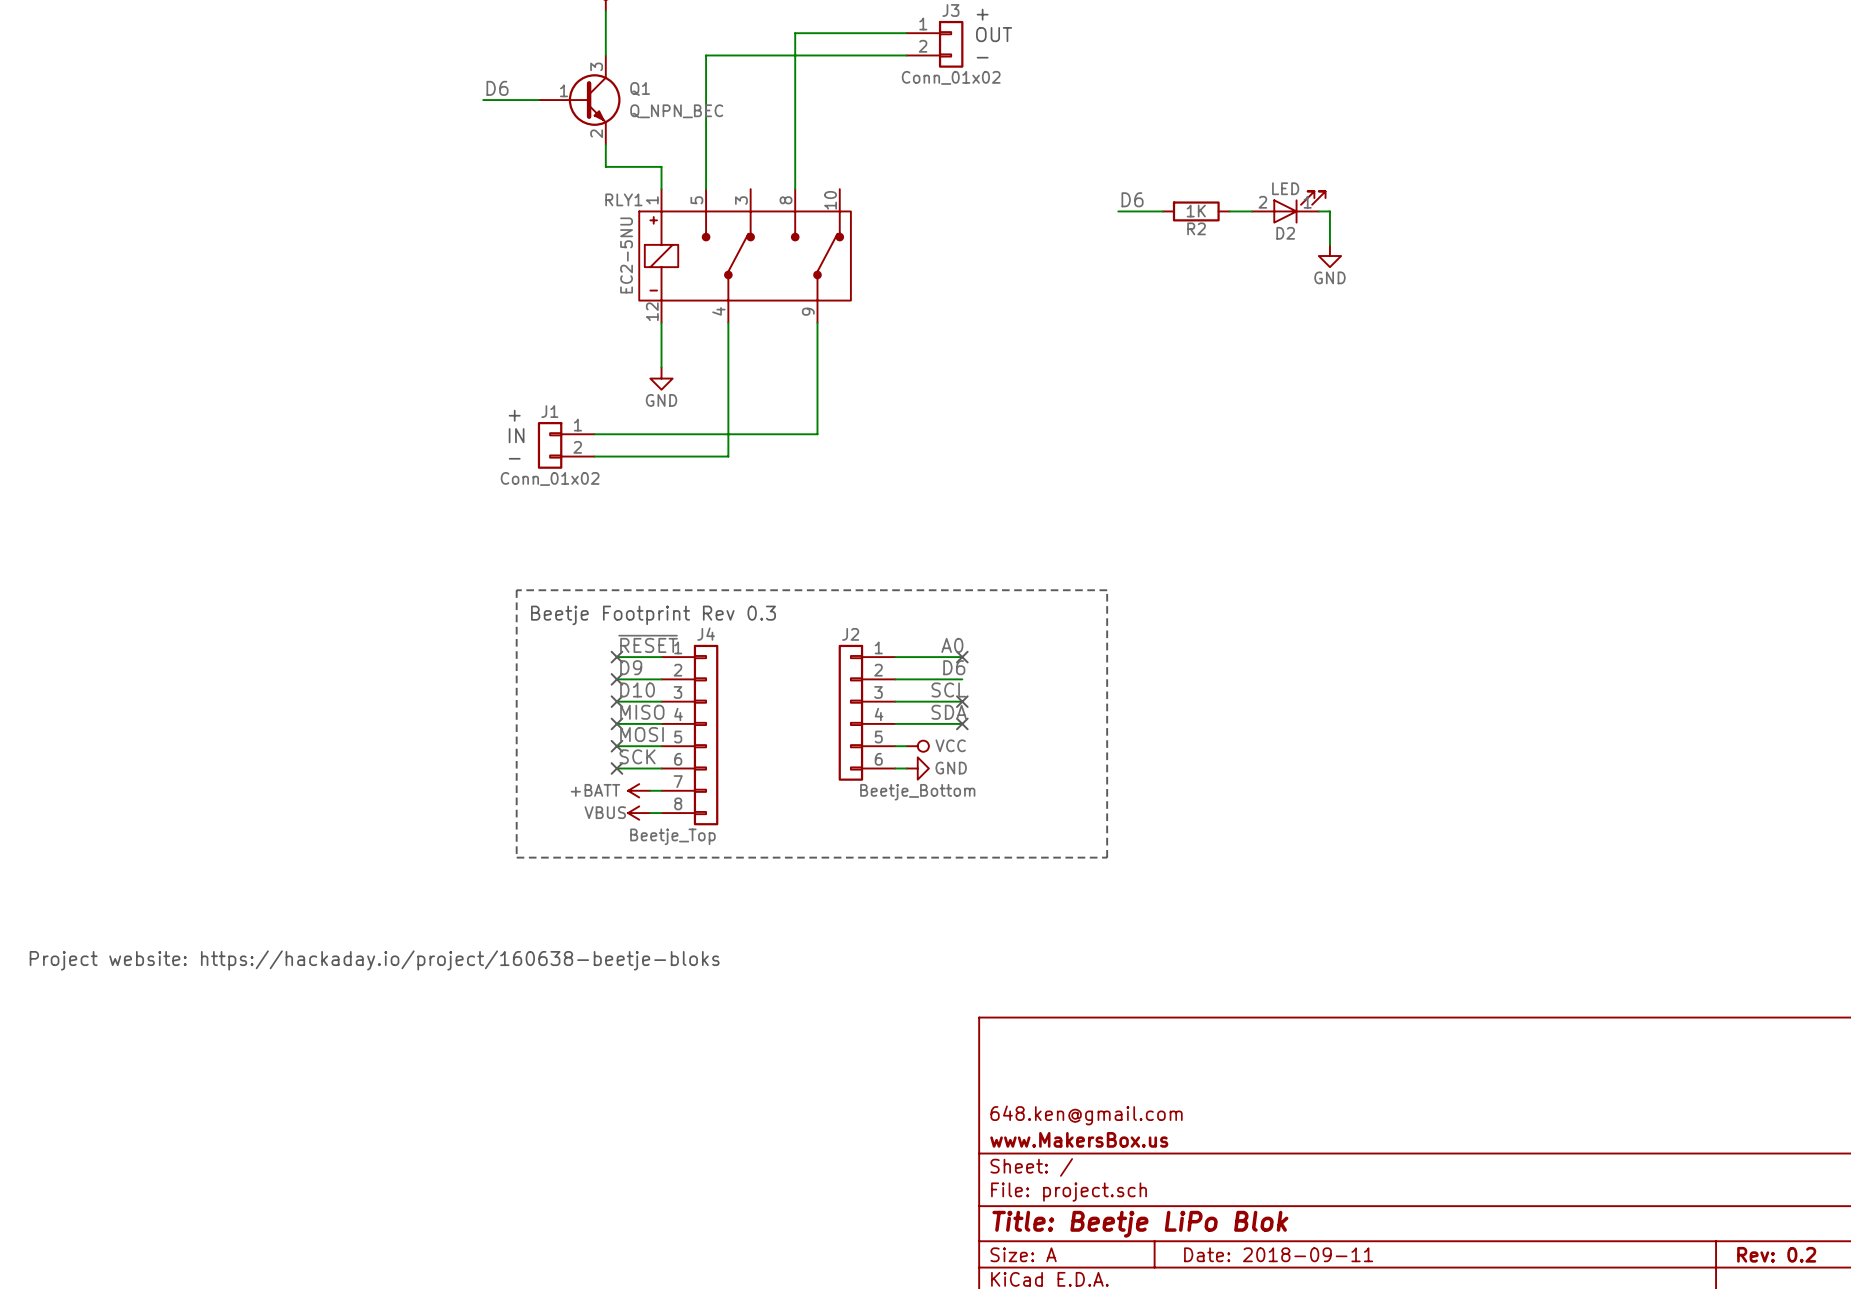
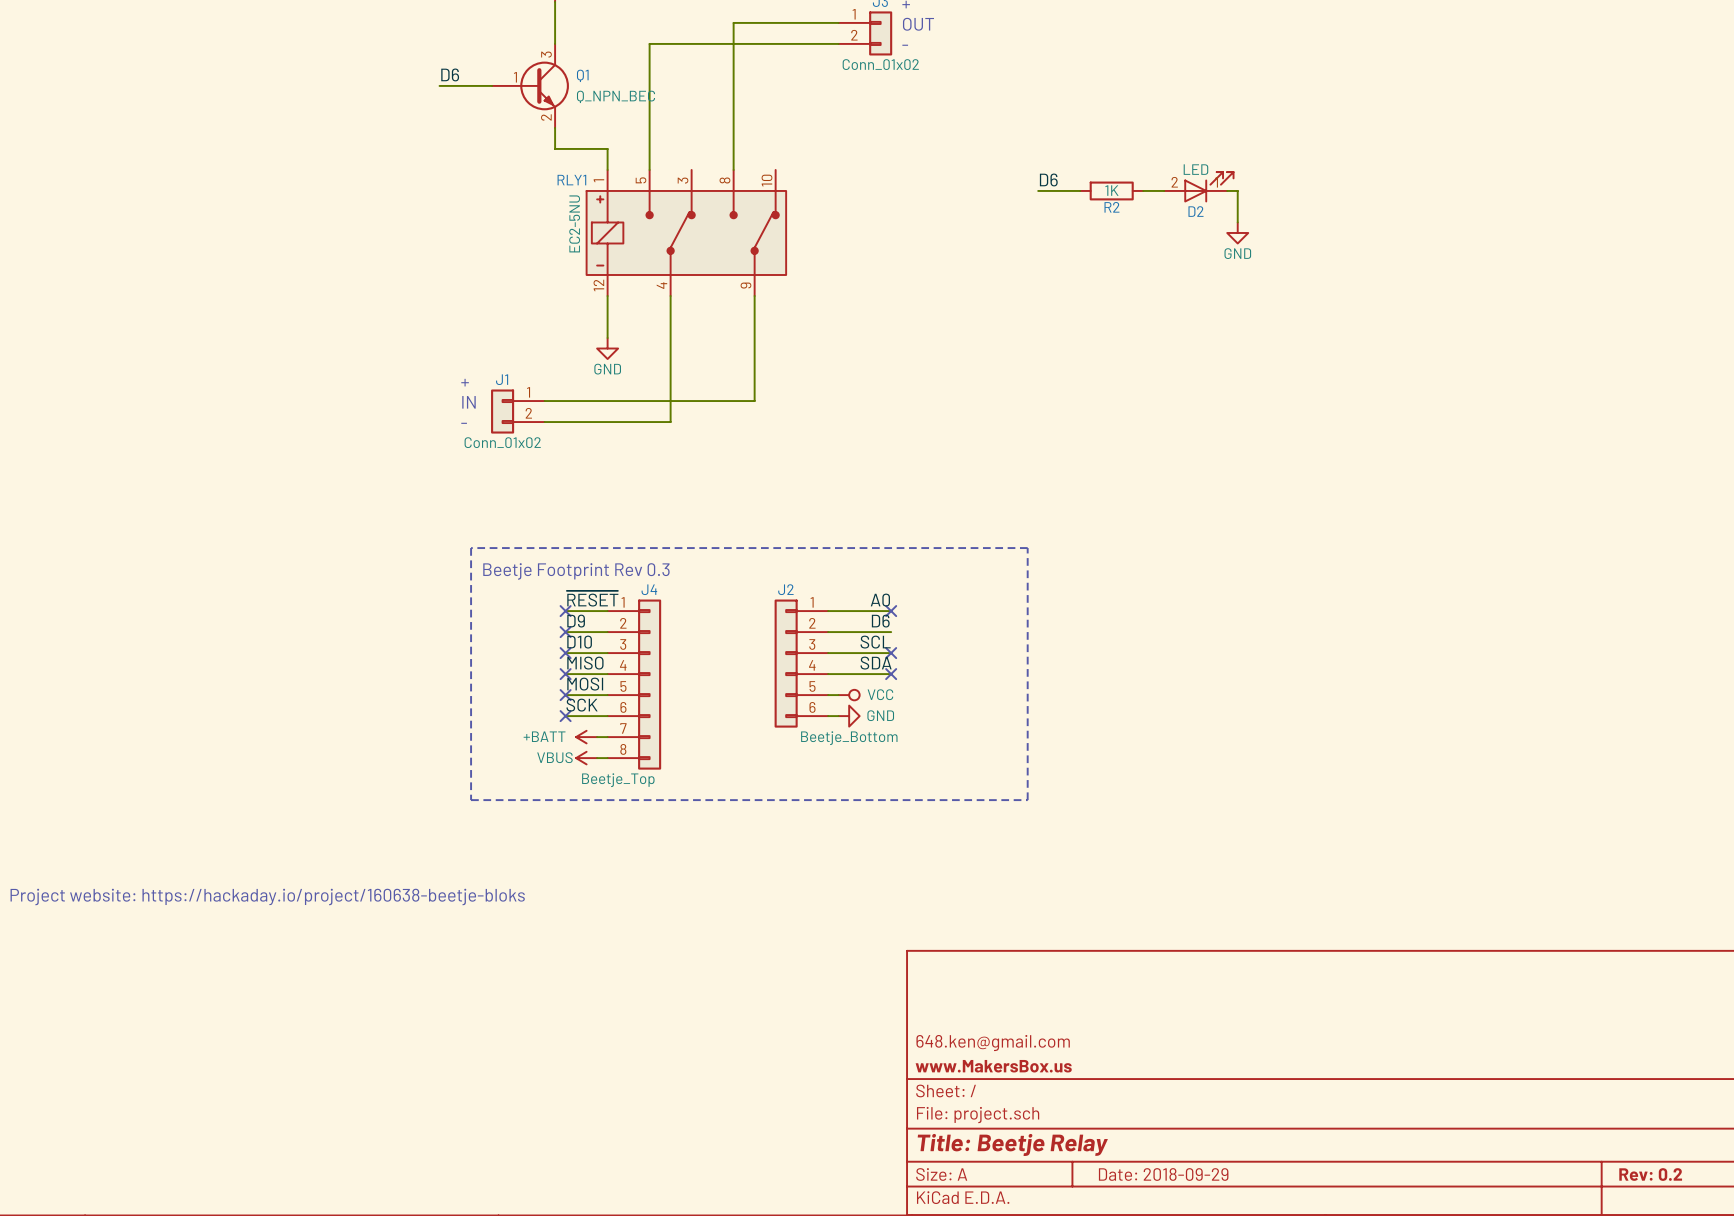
title block: Title: Beetje LiPo Blok (1140, 1224) -> Title: Beetje Relay (1012, 1144)
title block: Date: 2018-09-11 (1278, 1254) -> Date: 2018-09-29 (1163, 1174)

